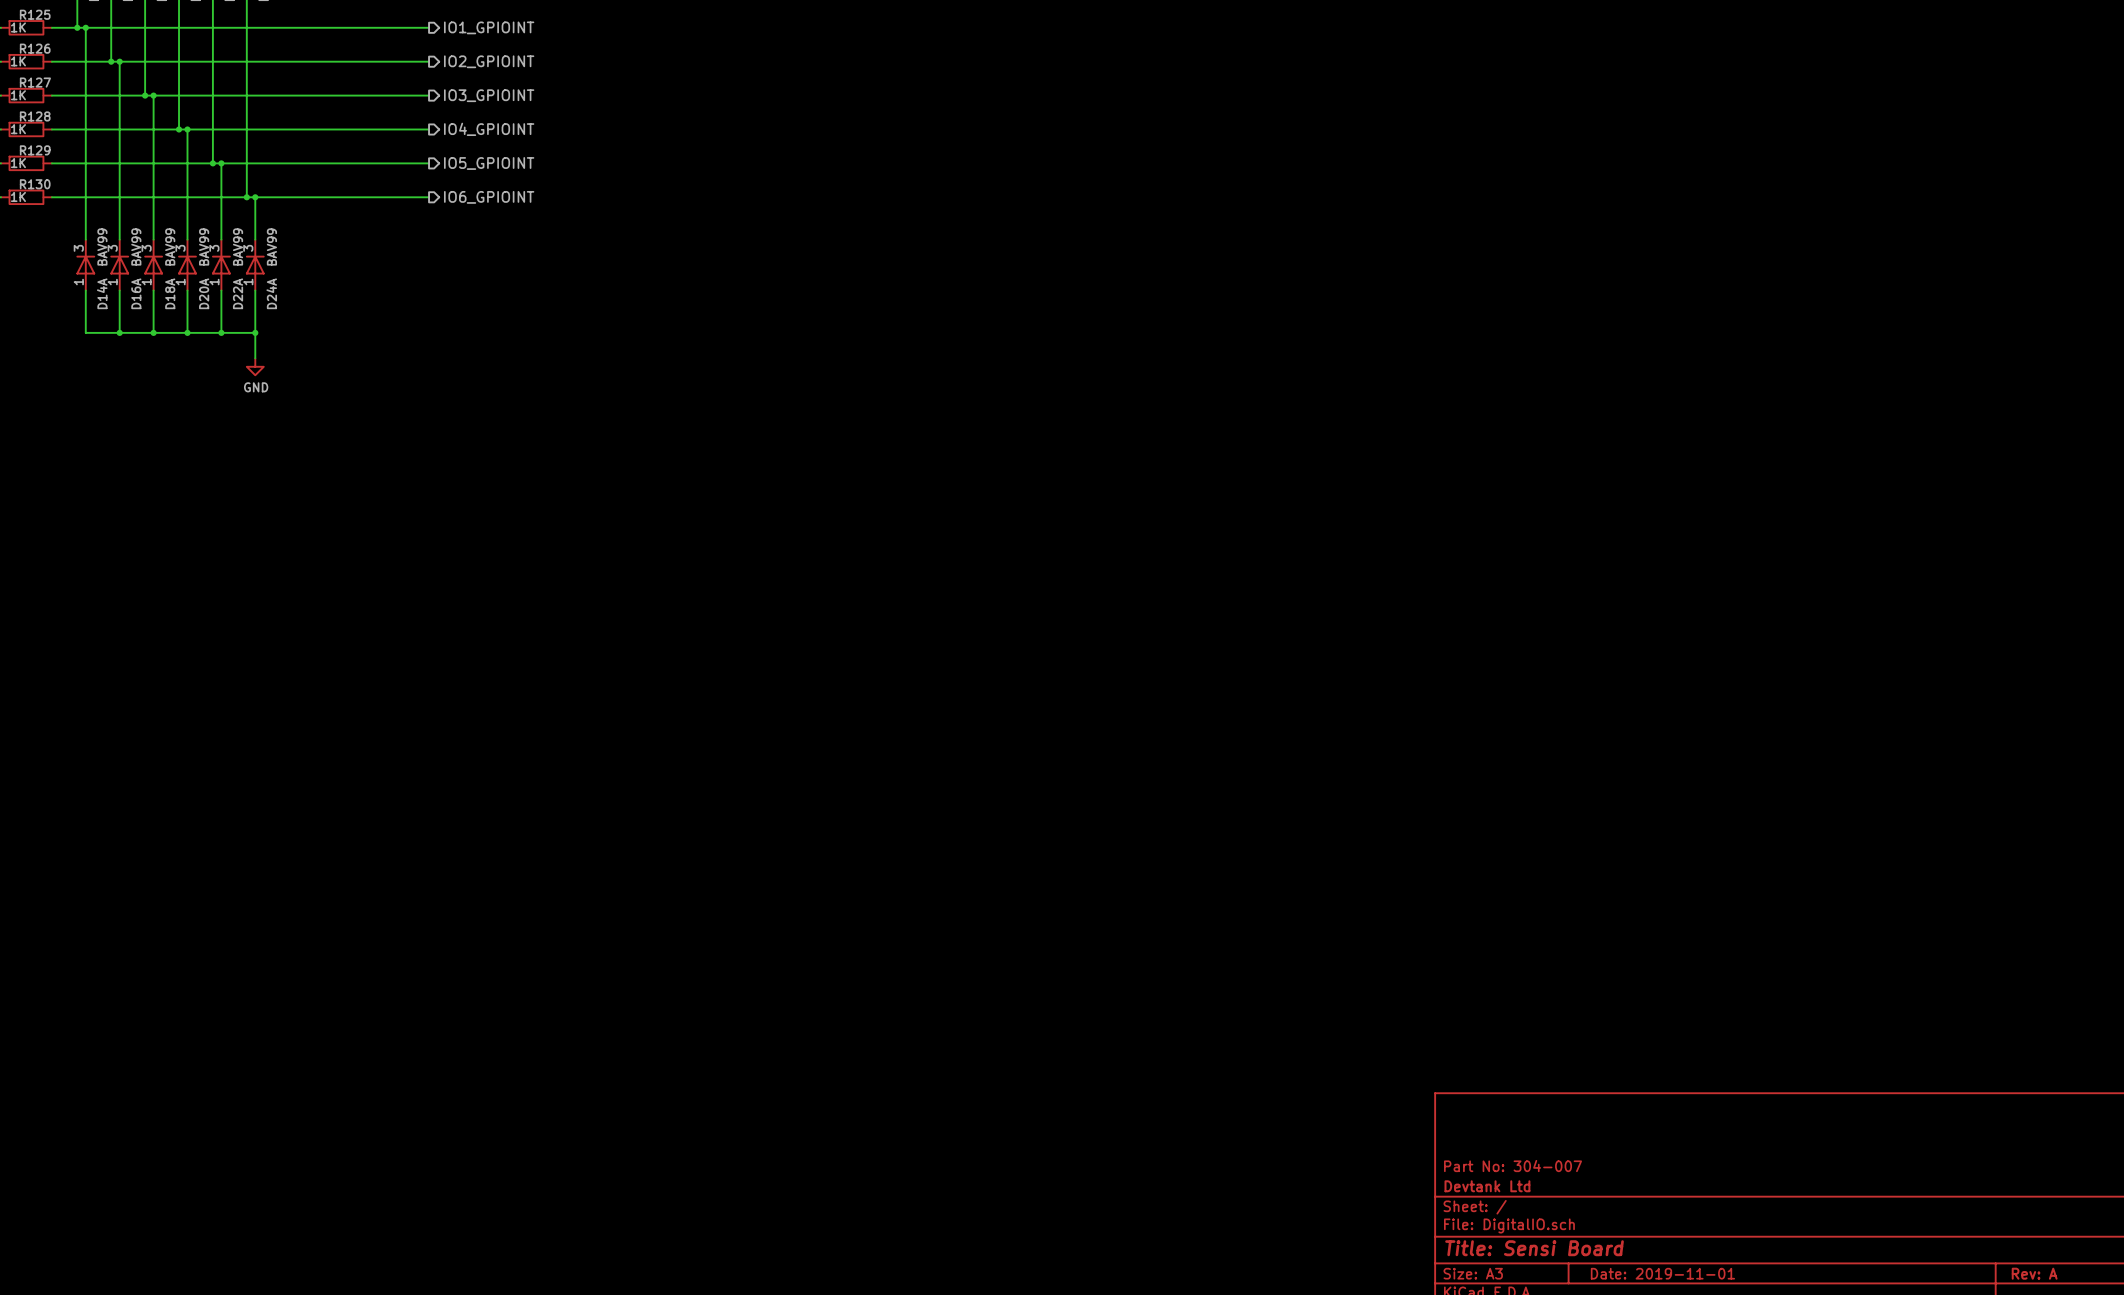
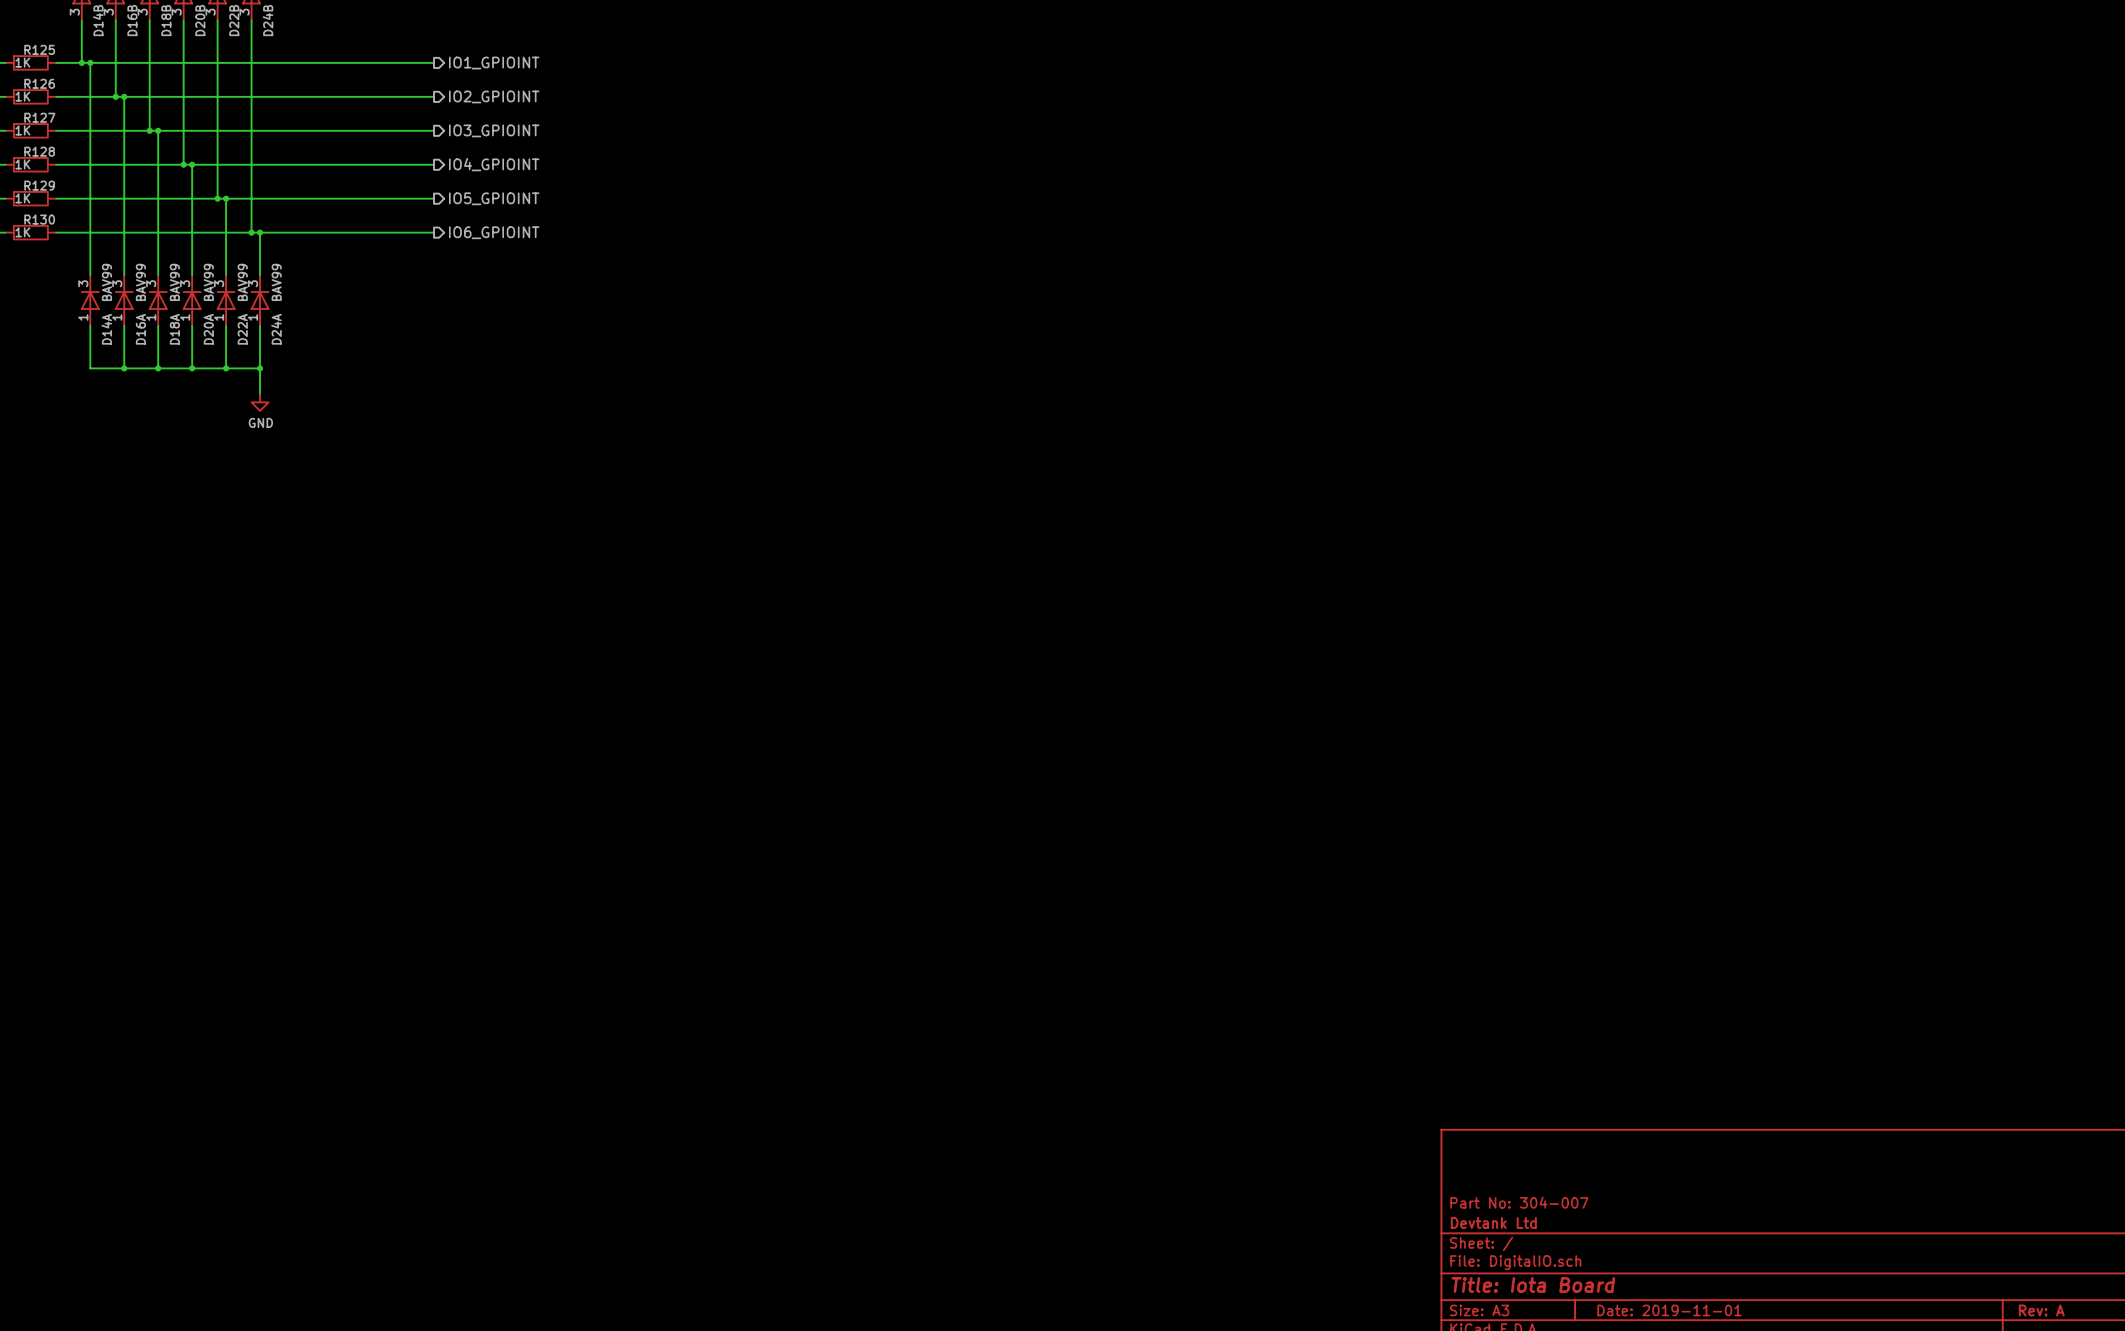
title block: Title: Sensi Board (1534, 1248) -> Title: Iota Board (1533, 1284)

